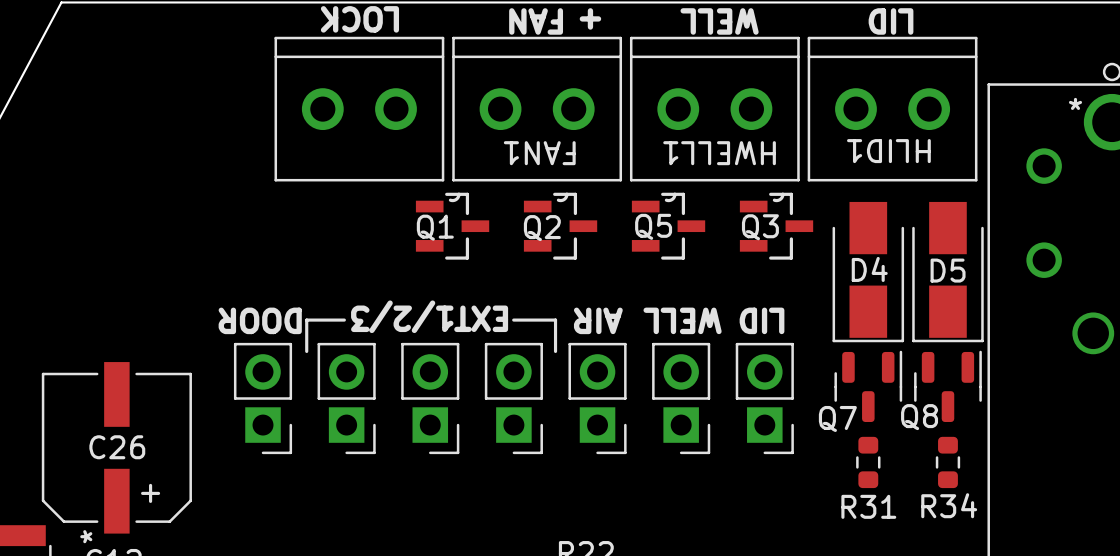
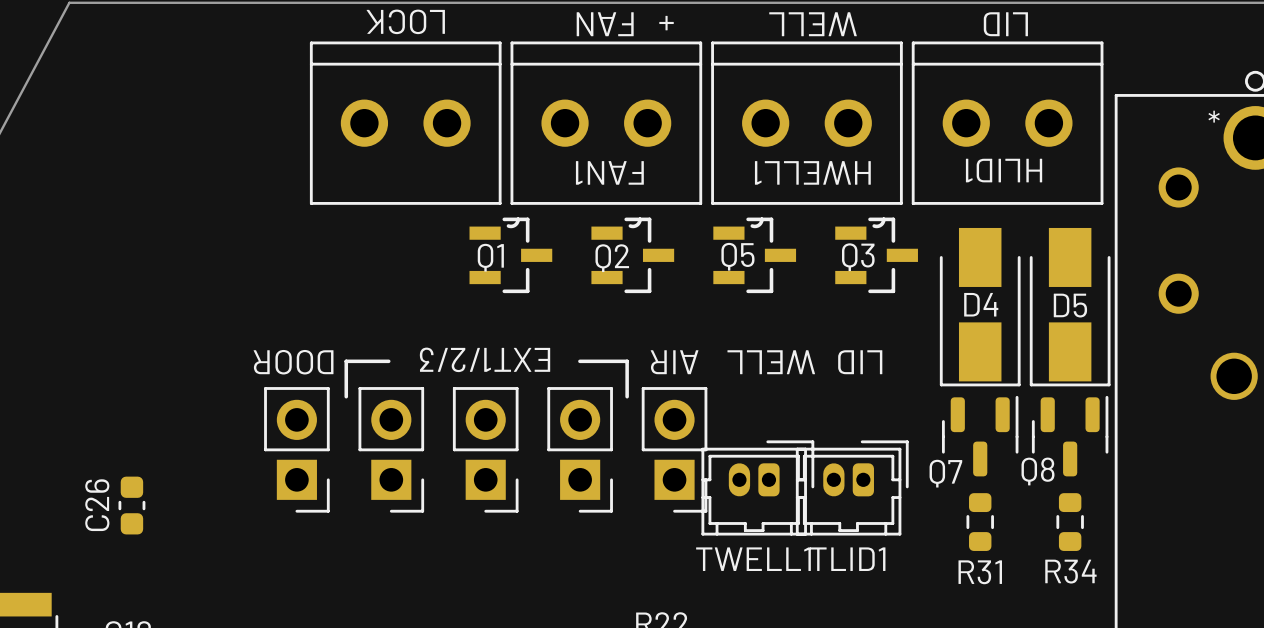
C26 footprint: [41, 362, 192, 534] -> [118, 476, 146, 535]
part: (681, 398) -> none
part: (764, 398) -> none
TWELL1: none -> (757, 487)
TLID1: none -> (852, 487)

